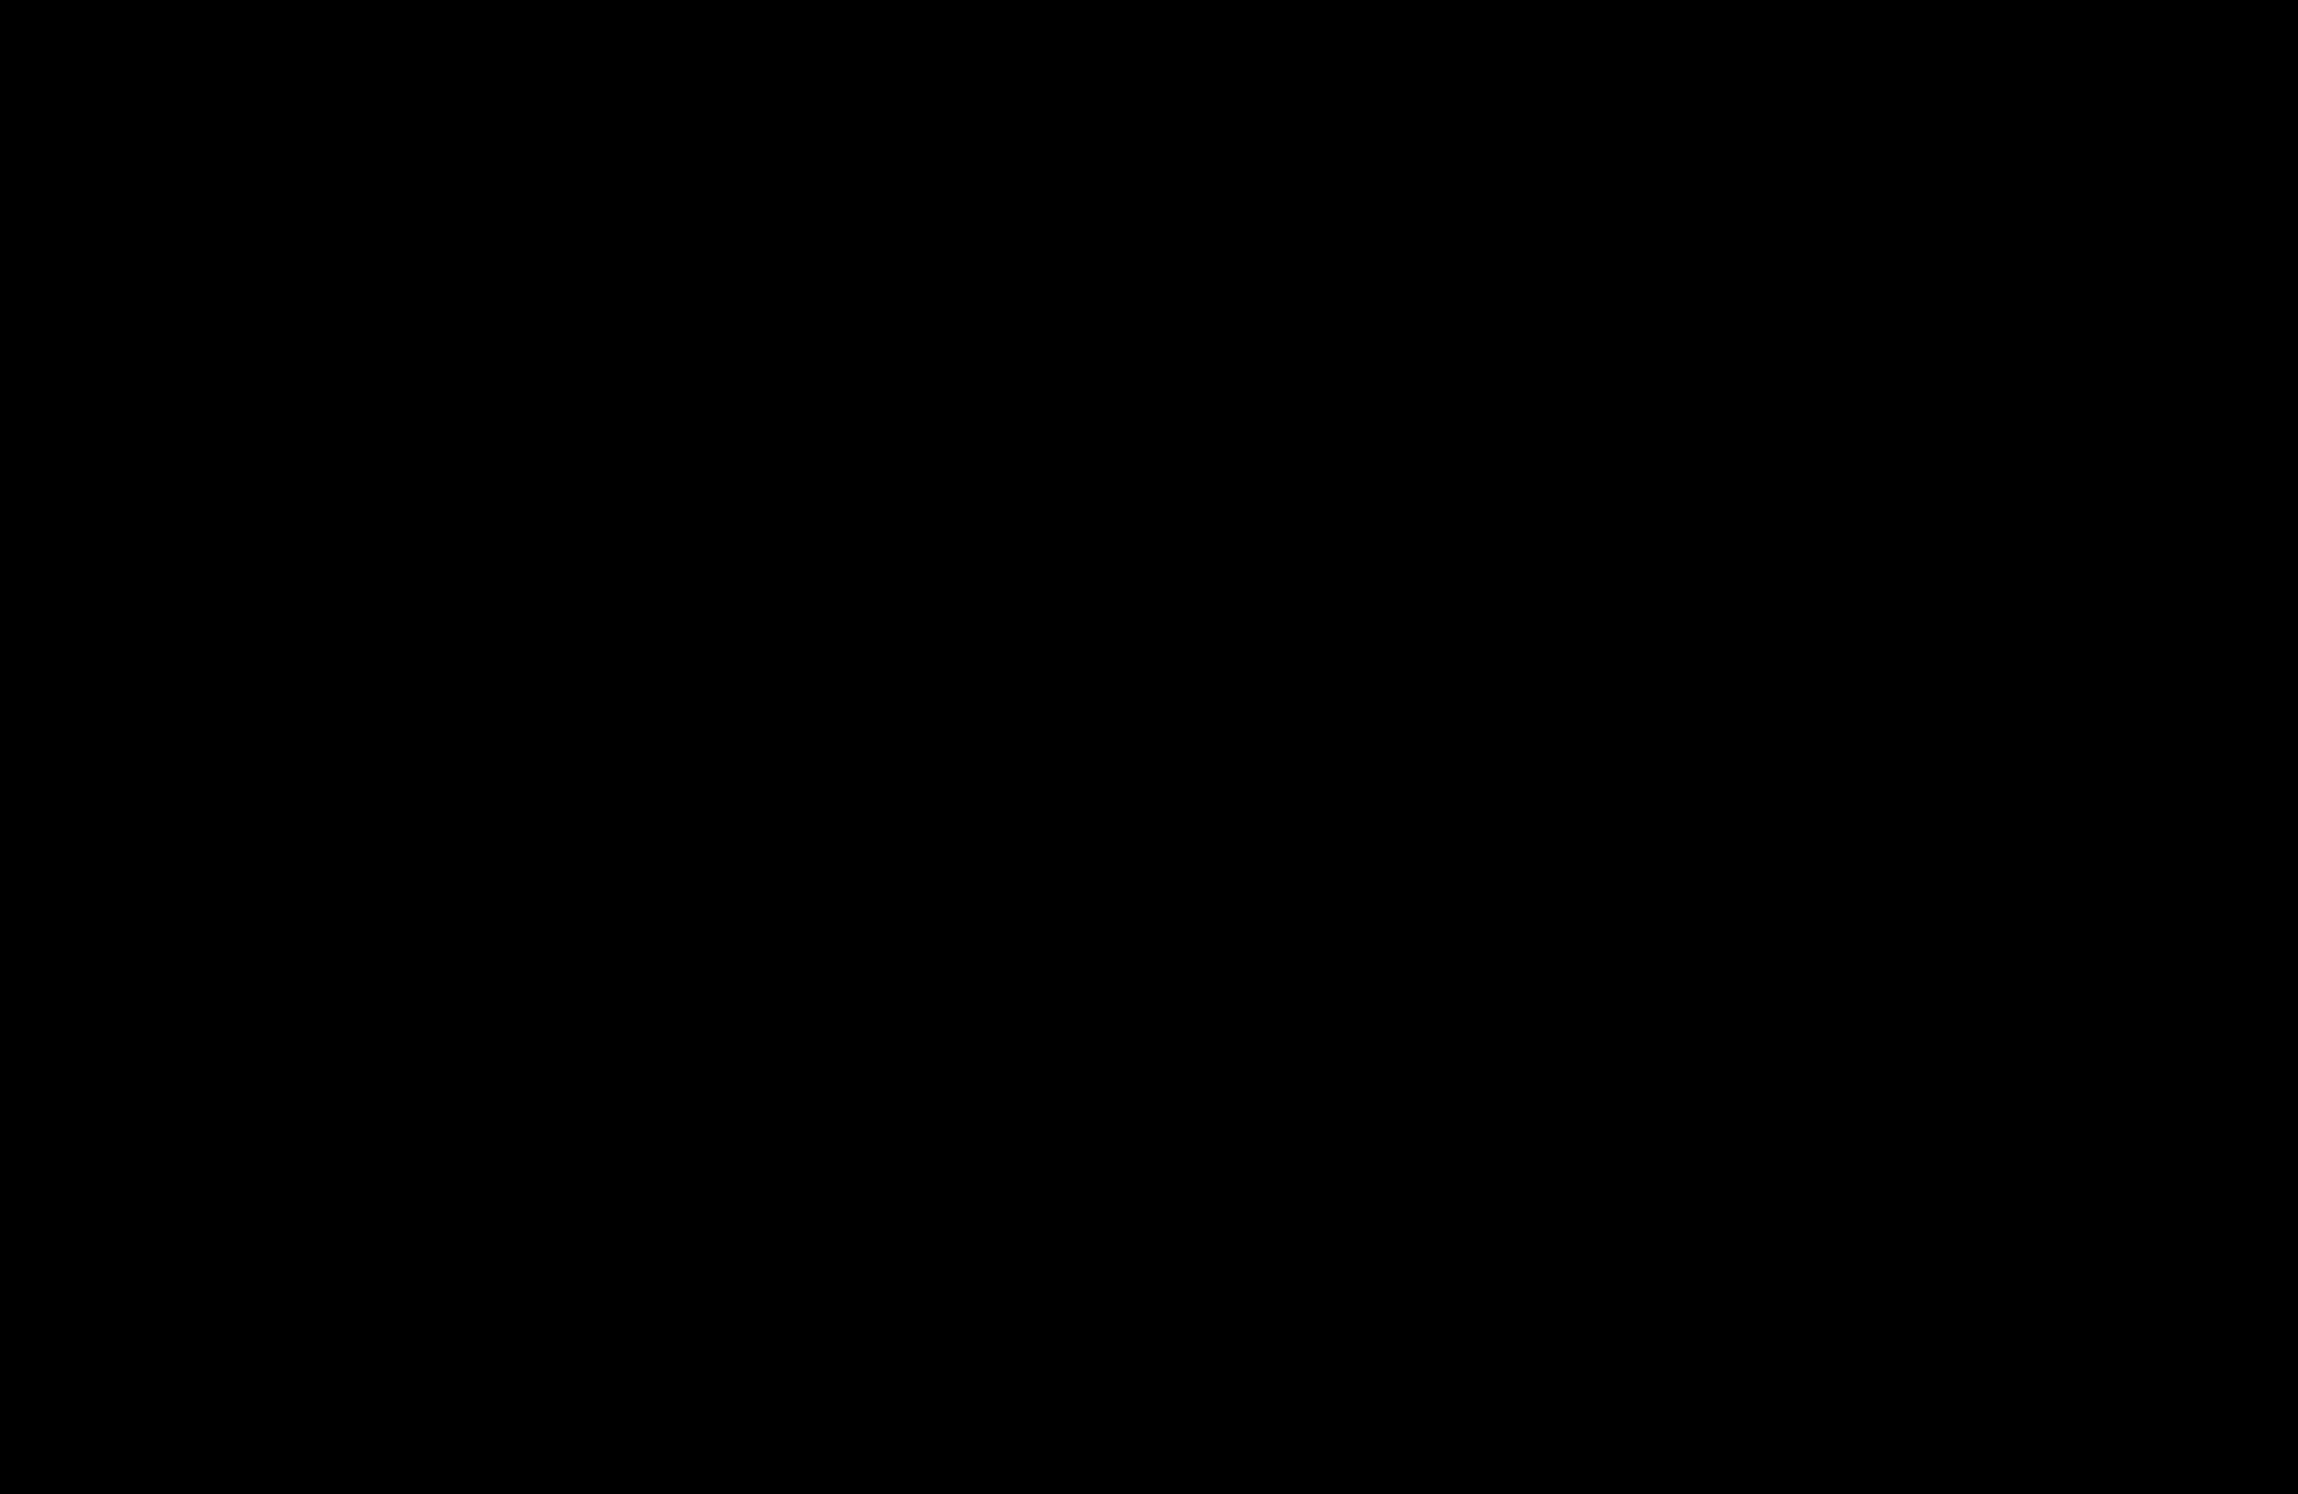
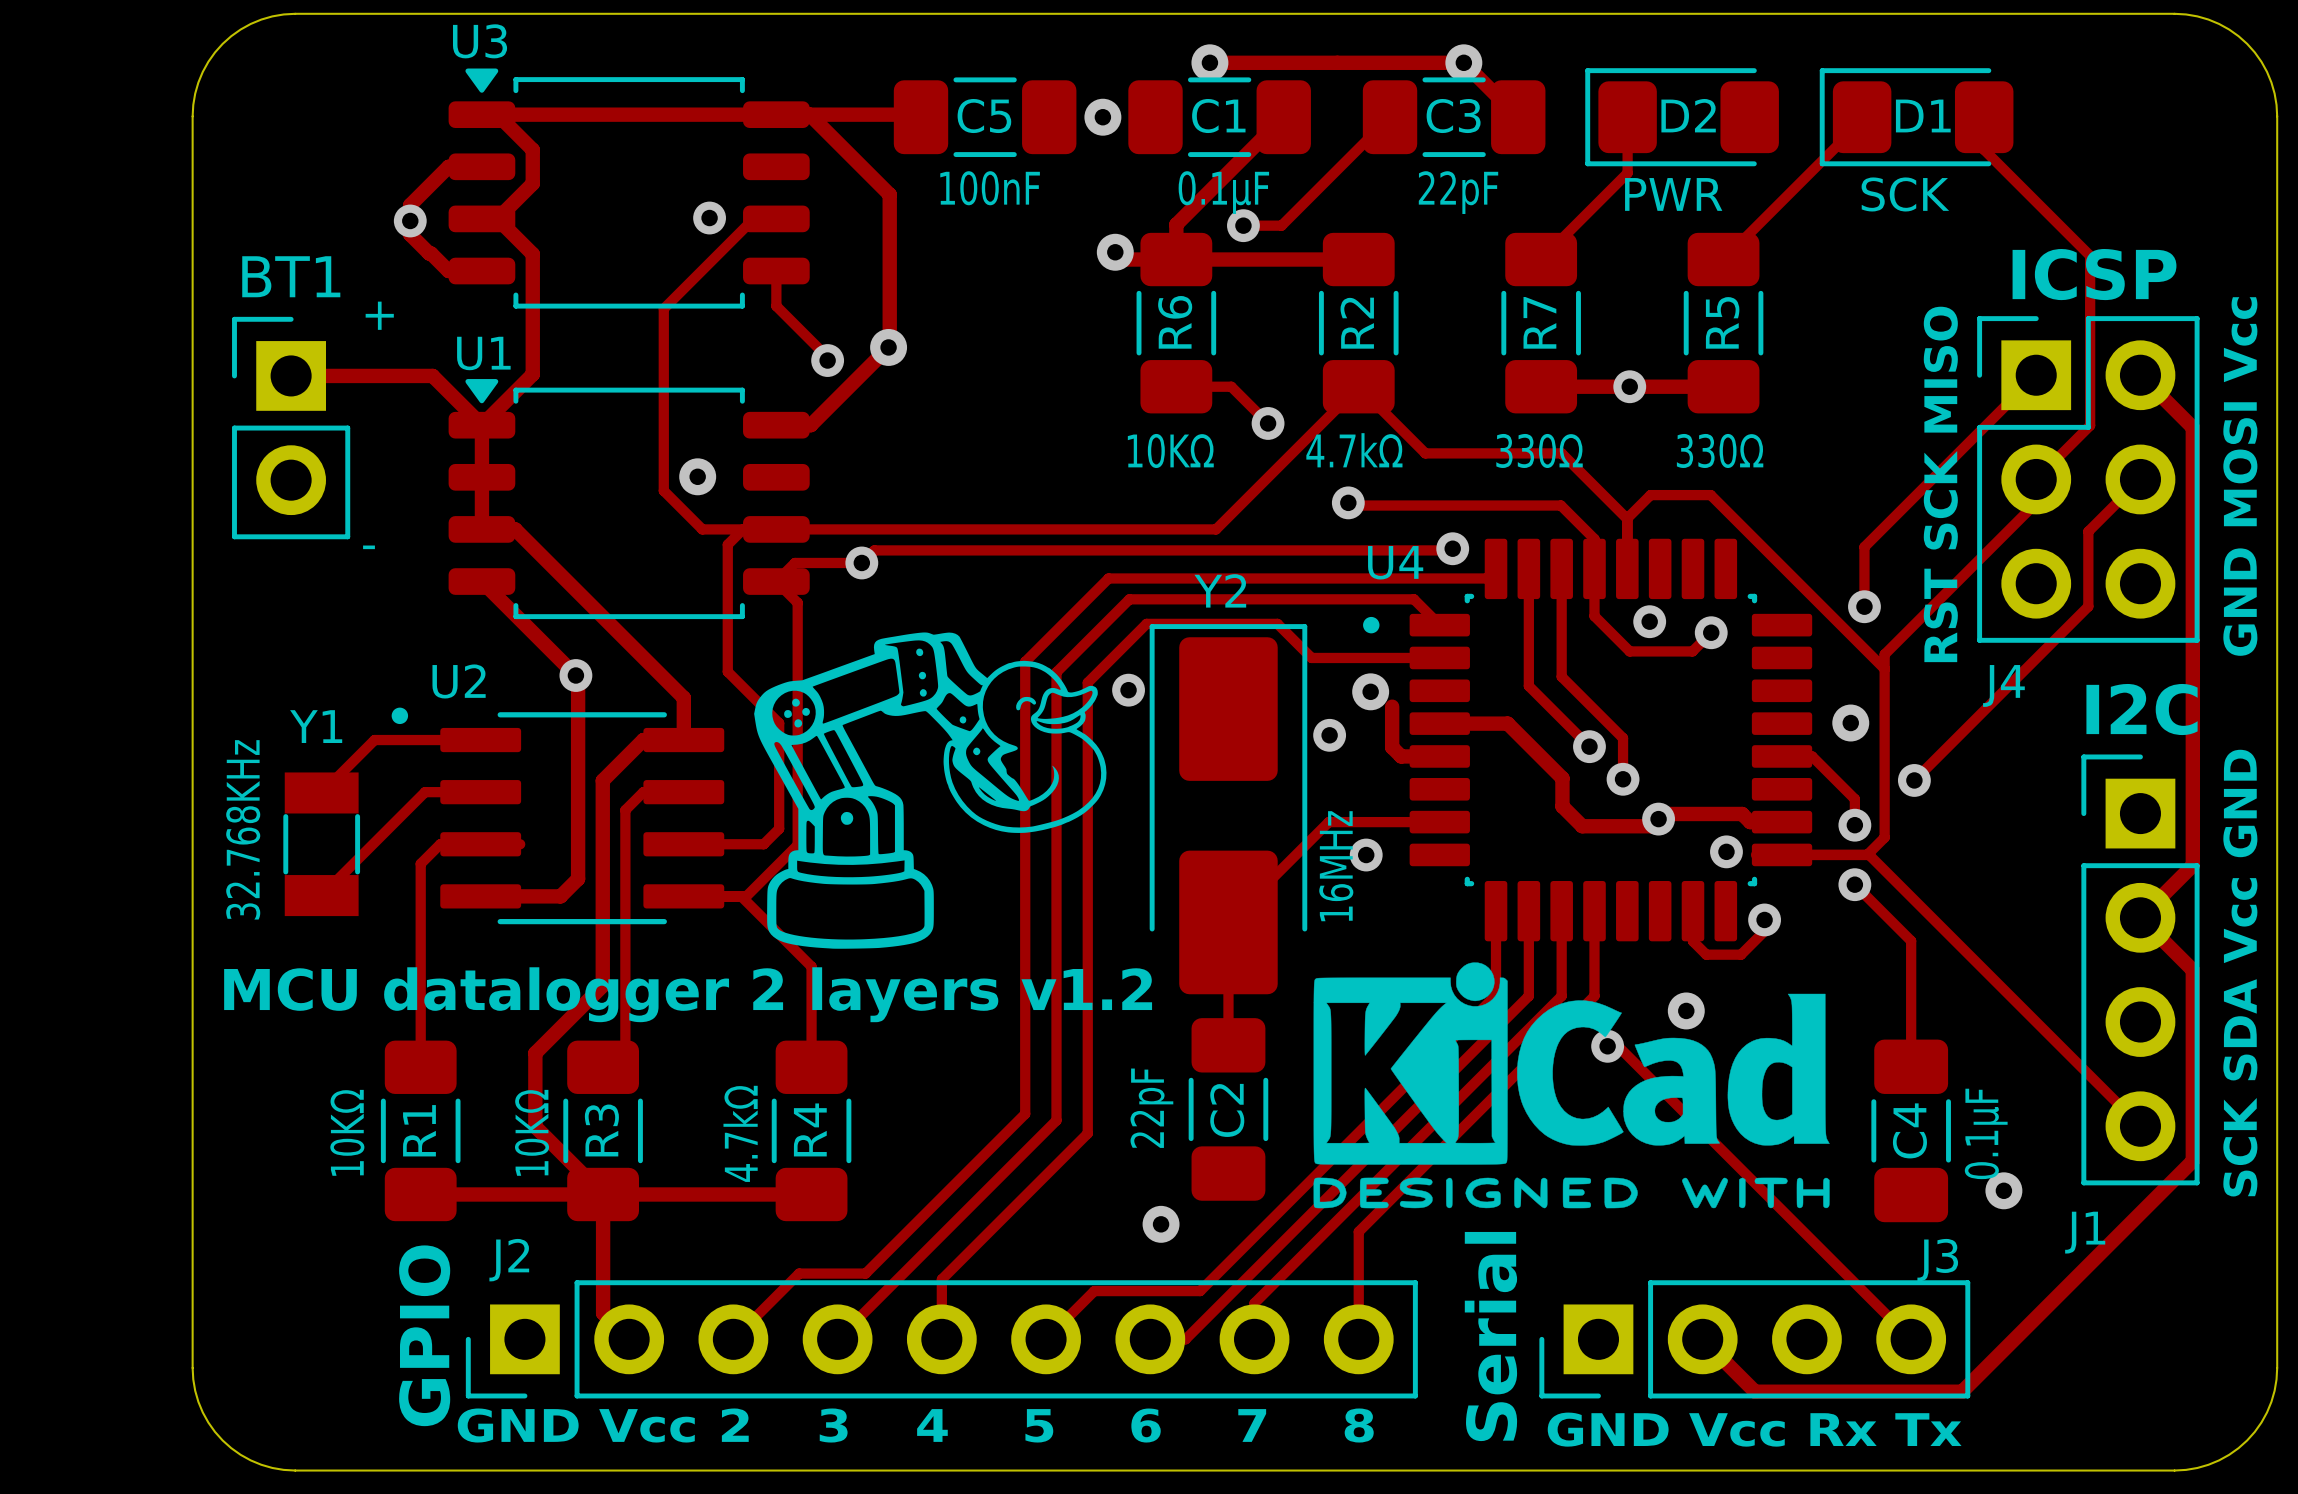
board edge: none -> (295, 13) (2174, 13) (2208, 19) (2238, 36) (2254, 52) (2267, 71) (2274, 93) (2277, 116) (2277, 1367) (2271, 1401) (2254, 1431) (2238, 1448) (2219, 1460) (2197, 1467) (2174, 1470) (295, 1470) (261, 1464) (231, 1448) (215, 1431) (202, 1412) (195, 1390) (192, 1367) (192, 116) (198, 82) (208, 61) (222, 43) (240, 29) (261, 19) (295, 13)
track: none -> (1209, 62) (1463, 62) (1518, 117) (1504, 130)
via: none -> (1209, 62)
via: none -> (1463, 62)
track: none -> (481, 114) (918, 114) (921, 117)
track: none -> (497, 114) (532, 149) (532, 183) (497, 218)
track: none -> (809, 114) (889, 194) (889, 346) (810, 425) (776, 425)
C5: none -> 100nF (985, 117)
via: none -> (1102, 117)
C1: none -> 0.1μF (1219, 117)
track: none -> (1283, 117) (1176, 224) (1176, 259)
C3: none -> 22pF (1454, 117)
track: none -> (1627, 117) (1627, 173) (1541, 259)
D2: none -> (1682, 117)
track: none -> (1862, 117) (1862, 120) (1723, 259)
D1: none -> (1916, 117)
track: none -> (1984, 117) (1984, 149) (2090, 255) (2090, 425) (2036, 479) (2036, 502) (1884, 654) (1884, 837) (1867, 854)
track: none -> (1390, 124) (1390, 117) (1281, 225) (1243, 225)
track: none -> (481, 166) (448, 166) (410, 205) (410, 234) (429, 253) (448, 271) (481, 271)
U3: none -> (629, 188)
text: none -> PWR (1673, 194)
text: none -> SCK (1905, 194)
track: none -> (497, 218) (532, 254) (532, 374) (481, 425)
via: none -> (709, 218)
track: none -> (776, 218) (753, 218) (663, 308) (663, 490) (702, 529) (1216, 529) (1358, 386) (1425, 453) (1561, 453) (1627, 519)
via: none -> (410, 220)
via: none -> (1243, 225)
track: none -> (1115, 252) (1122, 259) (1358, 259)
via: none -> (1115, 252)
track: none -> (776, 271) (776, 306) (827, 357) (827, 360)
text: none -> ICSP (2094, 274)
text: none -> + (379, 315)
R6: none -> 10KΩ (1176, 323)
R2: none -> 4.7kΩ (1358, 323)
R7: none -> 330Ω (1541, 323)
R5: none -> 330Ω (1723, 323)
via: none -> (888, 347)
via: none -> (827, 360)
track: none -> (291, 375) (432, 375) (481, 425)
track: none -> (2036, 375) (1864, 547) (1864, 606)
track: none -> (2140, 375) (2192, 427) (2192, 865) (2140, 917) (2192, 970) (2192, 1160) (1962, 1391) (1755, 1391) (1702, 1339)
track: none -> (1176, 386) (1231, 386) (1268, 423)
track: none -> (1541, 386) (1723, 386)
via: none -> (1629, 386)
via: none -> (1268, 423)
track: none -> (481, 425) (481, 529) (515, 529) (683, 697) (683, 740) (643, 740) (602, 780) (602, 985) (535, 1053) (535, 1126) (603, 1194) (603, 1313) (629, 1339)
BT1: none -> (291, 428)
via: none -> (697, 476)
text: none -> GND MOSI Vcc (2240, 476)
J4: none -> (2088, 479)
track: none -> (2140, 479) (2088, 531) (2088, 606) (1914, 780)
text: none -> RST SCK MISO (1940, 484)
U1: none -> (629, 499)
track: none -> (1348, 502) (1350, 505) (1560, 505) (1594, 539) (1594, 616) (1629, 651) (1692, 651) (1711, 632)
via: none -> (1348, 502)
track: none -> (743, 529) (727, 544) (727, 671) (779, 723) (779, 828) (763, 844) (723, 844)
text: none -> - (369, 547)
track: none -> (1452, 548) (1452, 550) (874, 550) (861, 562) (794, 562) (776, 581) (797, 602) (797, 845) (746, 896) (723, 896)
via: none -> (1452, 548)
via: none -> (861, 562)
track: none -> (1496, 568) (1486, 578) (1108, 578) (1025, 661) (1025, 1113) (865, 1273) (799, 1273) (733, 1339)
track: none -> (1528, 568) (1528, 686) (1589, 746)
track: none -> (1561, 568) (1561, 676) (1623, 738) (1623, 779)
track: none -> (1627, 568) (1627, 518) (1650, 495) (1710, 495) (1884, 668)
track: none -> (481, 581) (578, 677) (578, 878) (560, 896) (520, 896)
via: none -> (1864, 606)
via: none -> (1649, 621)
track: none -> (1439, 625) (1413, 599) (1129, 599) (1056, 672) (1056, 1120) (837, 1339) (865, 1339)
drawing: none -> [754, 632, 1107, 949]
via: none -> (1711, 632)
track: none -> (1439, 657) (1311, 657) (1277, 623) (1146, 623) (1087, 682) (1087, 1133) (941, 1279) (941, 1339)
via: none -> (575, 675)
via: none -> (1128, 690)
via: none -> (1370, 691)
track: none -> (1392, 706) (1392, 747) (1401, 756) (1439, 756)
text: none -> I2C (2142, 709)
track: none -> (1439, 723) (1507, 723) (1562, 778) (1562, 806) (1582, 826) (1651, 826) (1663, 813) (1742, 813) (1750, 822) (1782, 822)
via: none -> (1850, 723)
via: none -> (1329, 735)
track: none -> (480, 740) (374, 740) (321, 792)
U4: none -> (1587, 740)
via: none -> (1589, 746)
track: none -> (1782, 756) (1812, 756) (1854, 799) (1854, 825)
via: none -> (1623, 779)
via: none -> (1914, 780)
track: none -> (480, 792) (425, 792) (321, 895)
track: none -> (683, 792) (643, 792) (625, 810) (625, 1045) (603, 1067)
Y2: none -> 16MHz (1228, 809)
U2: none -> (557, 815)
via: none -> (1658, 819)
track: none -> (1439, 822) (1328, 822) (1228, 922) (1228, 1045)
via: none -> (1854, 825)
Y1: none -> 32.768KHz (321, 844)
track: none -> (520, 844) (440, 844) (420, 863) (420, 1067)
via: none -> (1726, 851)
track: none -> (1756, 854) (1869, 854) (2140, 1126)
via: none -> (1366, 855)
via: none -> (1854, 884)
track: none -> (1854, 895) (1854, 884) (1911, 940) (1911, 1066)
track: none -> (741, 896) (811, 966) (811, 1067)
track: none -> (1496, 911) (1496, 995) (1200, 1291) (1094, 1291) (1046, 1339)
track: none -> (1528, 911) (1528, 996) (1185, 1339) (1150, 1339)
track: none -> (1561, 911) (1561, 996) (1254, 1303) (1254, 1339)
track: none -> (1594, 911) (1594, 996) (1358, 1231) (1358, 1316)
track: none -> (1692, 911) (1692, 941) (1706, 954) (1741, 954) (1764, 931) (1764, 919)
via: none -> (1764, 919)
drawing: none -> [1313, 962, 1830, 1209]
J1: none -> (2140, 969)
text: none -> SCK SDA Vcc GND (2240, 973)
text: none -> MCU datalogger 2 layers v1.2 (688, 994)
via: none -> (1686, 1010)
track: none -> (1607, 1046) (1618, 1046) (1911, 1339)
via: none -> (1607, 1046)
C2: none -> 22pF (1228, 1109)
R1: none -> 10KΩ (420, 1130)
R3: none -> 10KΩ (603, 1130)
R4: none -> 4.7kΩ (811, 1130)
C4: none -> 0.1μF (1911, 1130)
via: none -> (2003, 1190)
track: none -> (420, 1194) (811, 1194)
via: none -> (1161, 1224)
text: none -> Serial (1490, 1336)
text: none -> GPIO (424, 1335)
J2: none -> (941, 1339)
J3: none -> (1754, 1339)
text: none -> 4 (932, 1425)
text: none -> GND Vcc (576, 1425)
text: none -> 2 (735, 1425)
text: none -> 3 (833, 1425)
text: none -> 5 (1039, 1425)
text: none -> 6 (1146, 1425)
text: none -> 7 (1252, 1425)
text: none -> 8 (1359, 1425)
text: none -> GND Vcc Rx Tx (1754, 1429)

